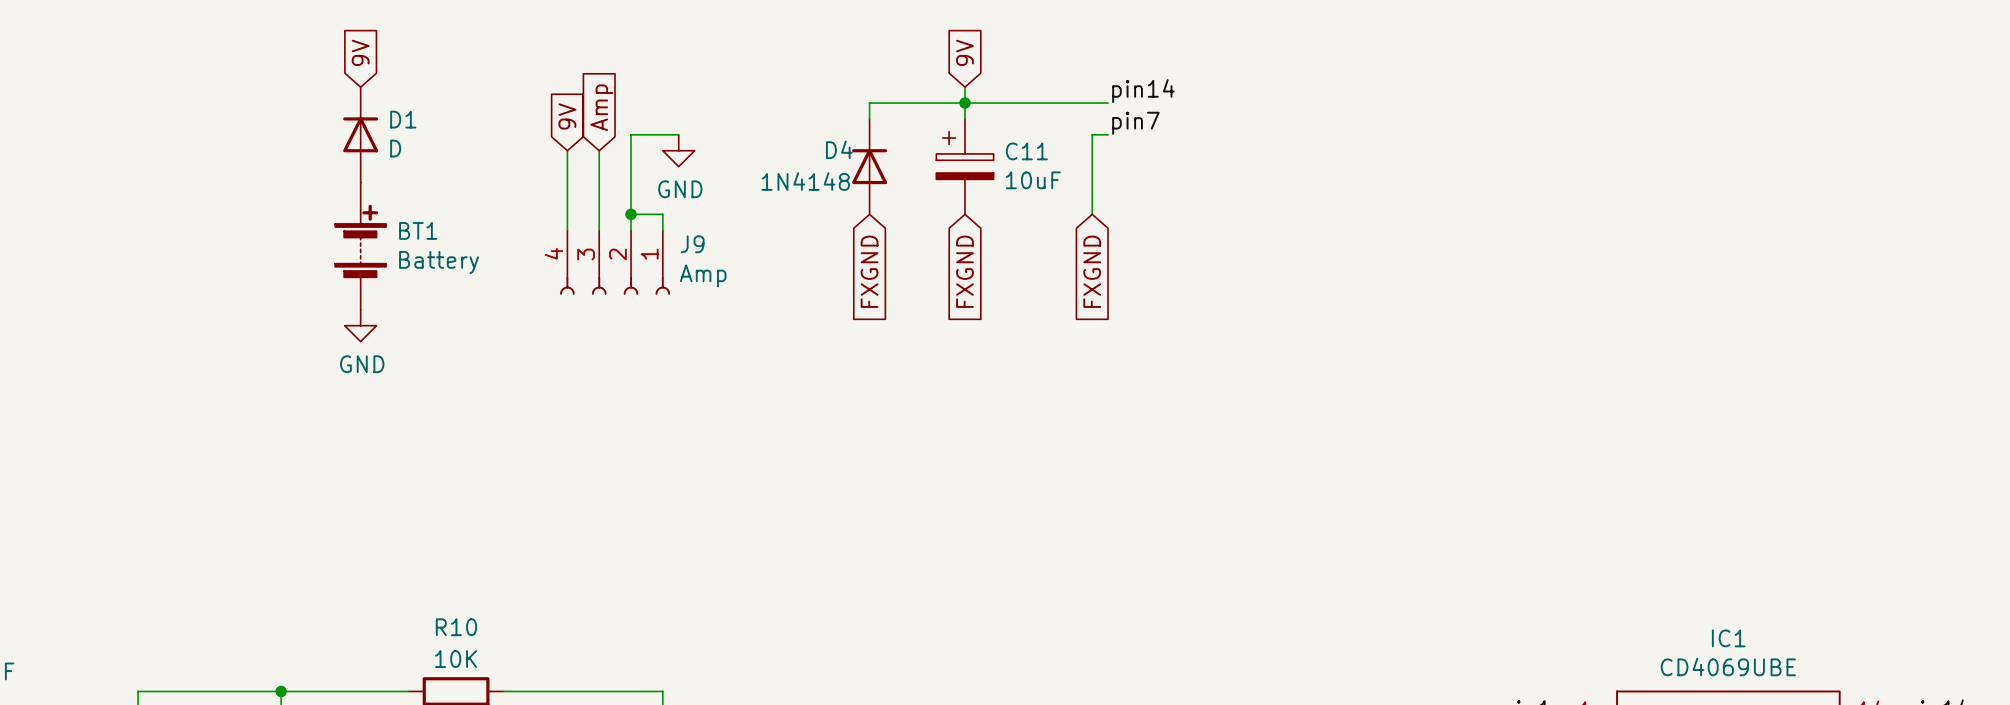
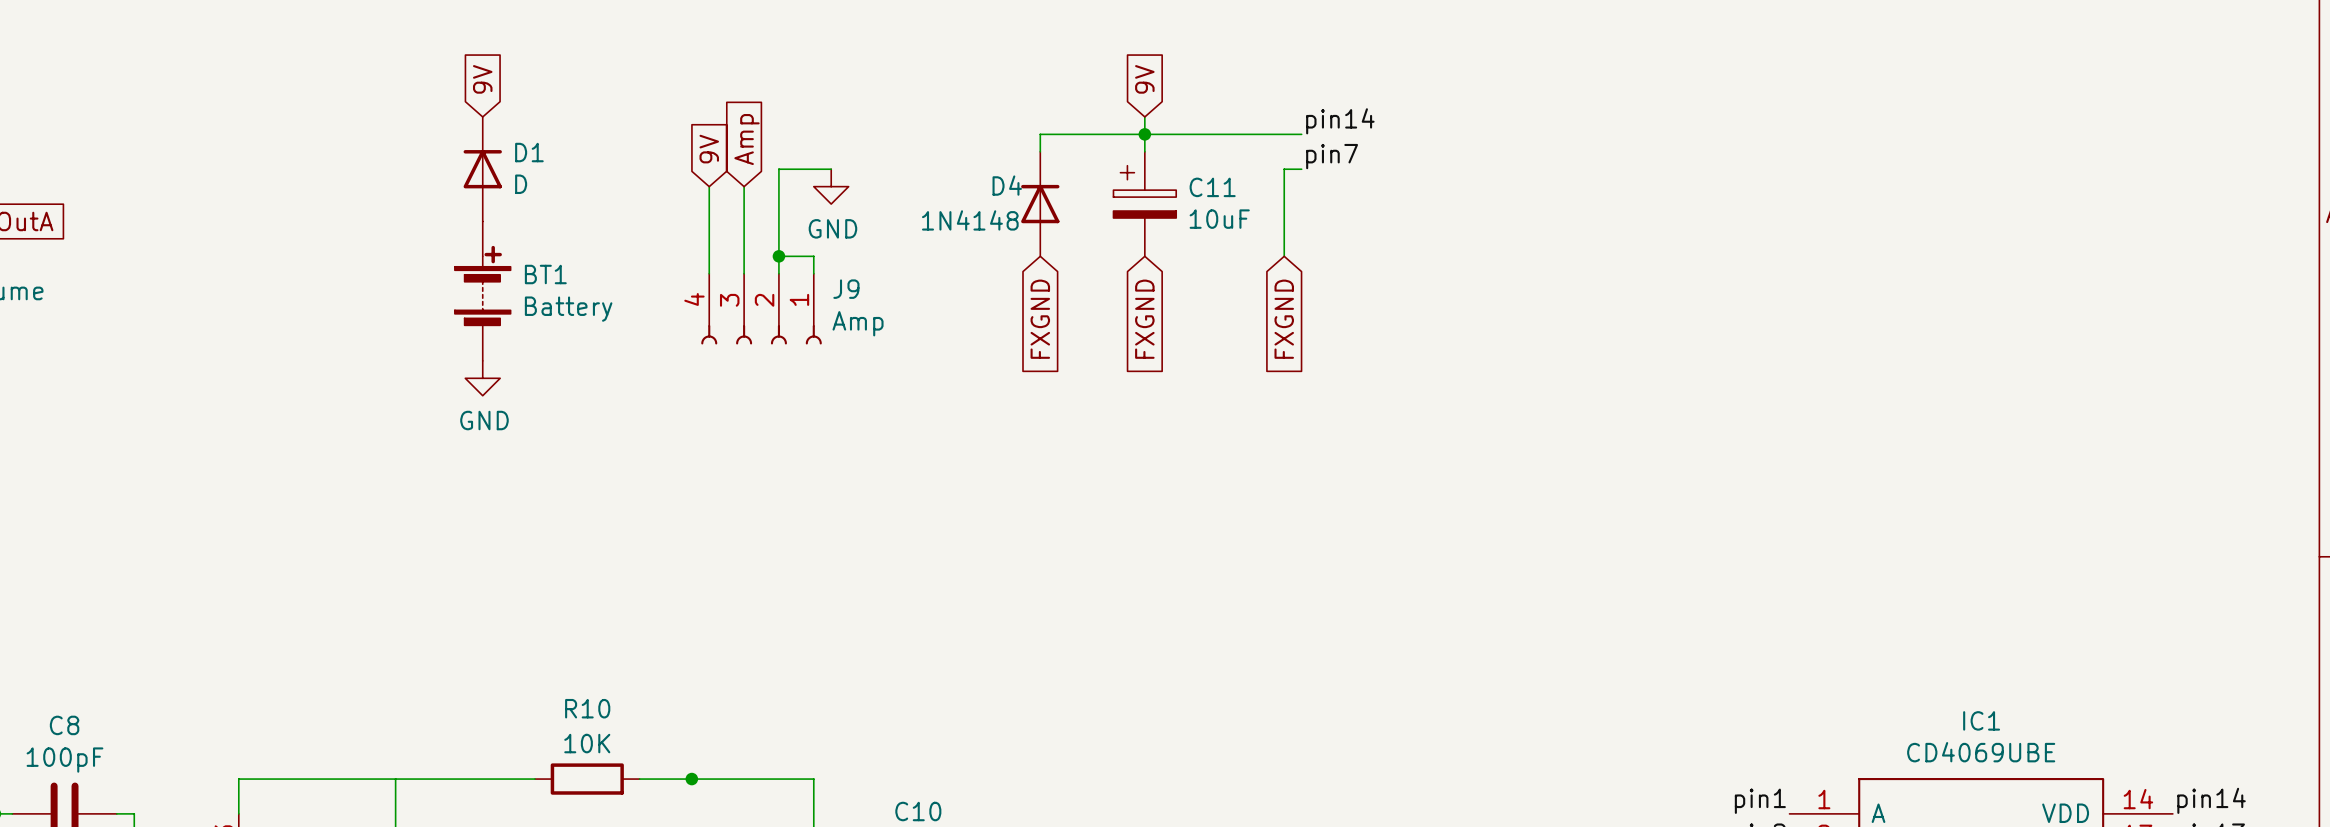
junction: (281, 691) -> none
junction: none -> (691, 779)

